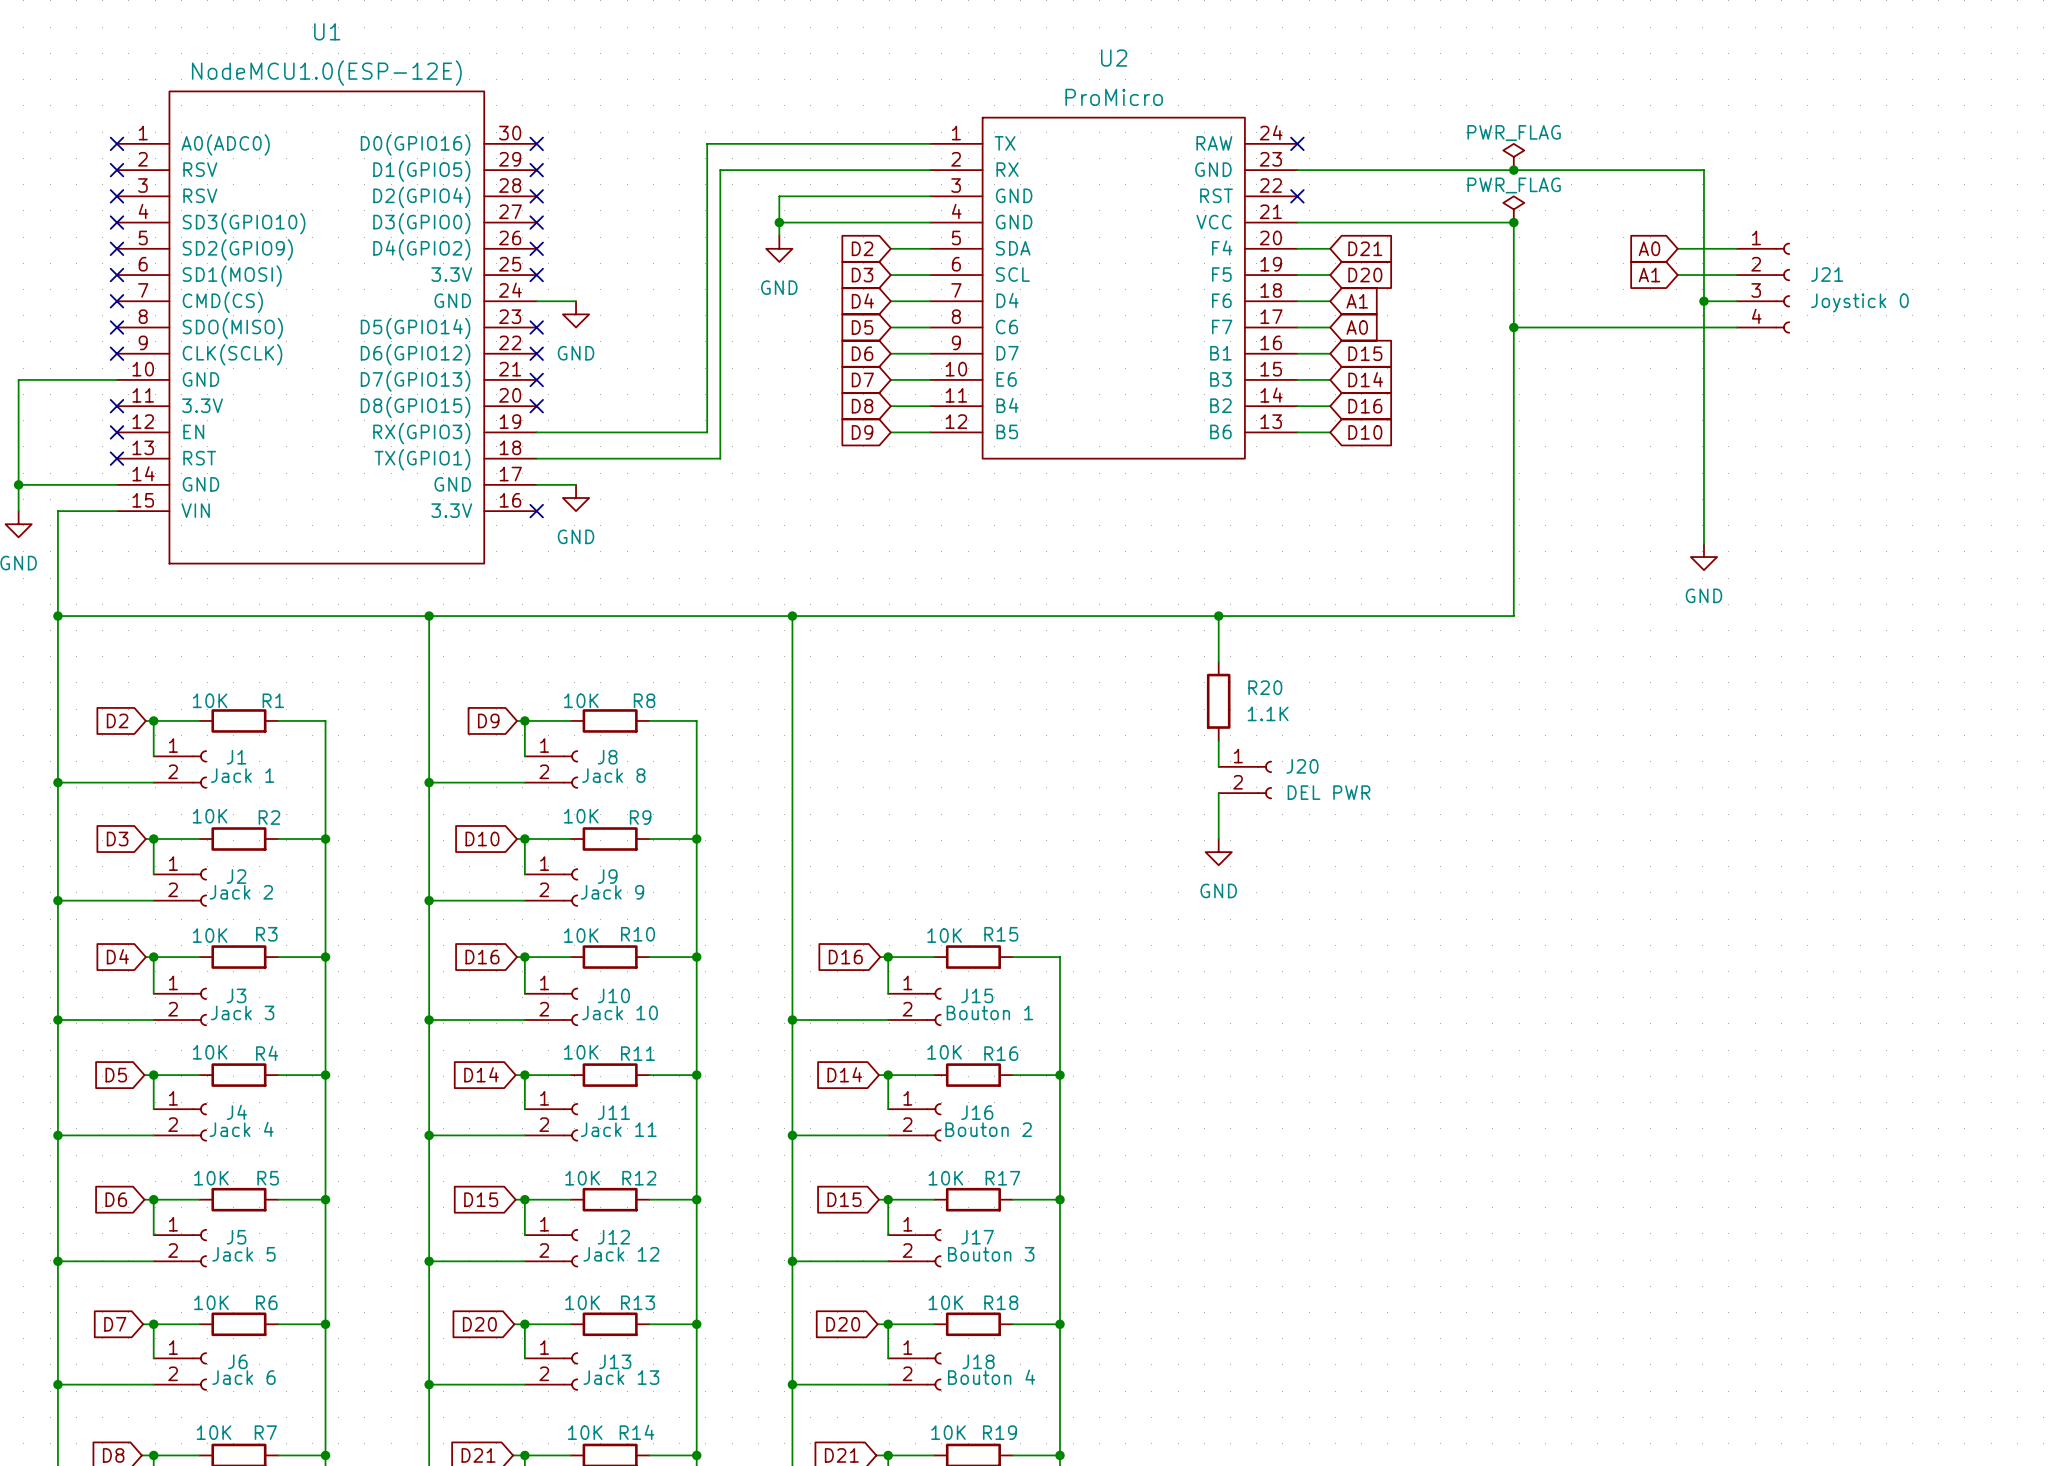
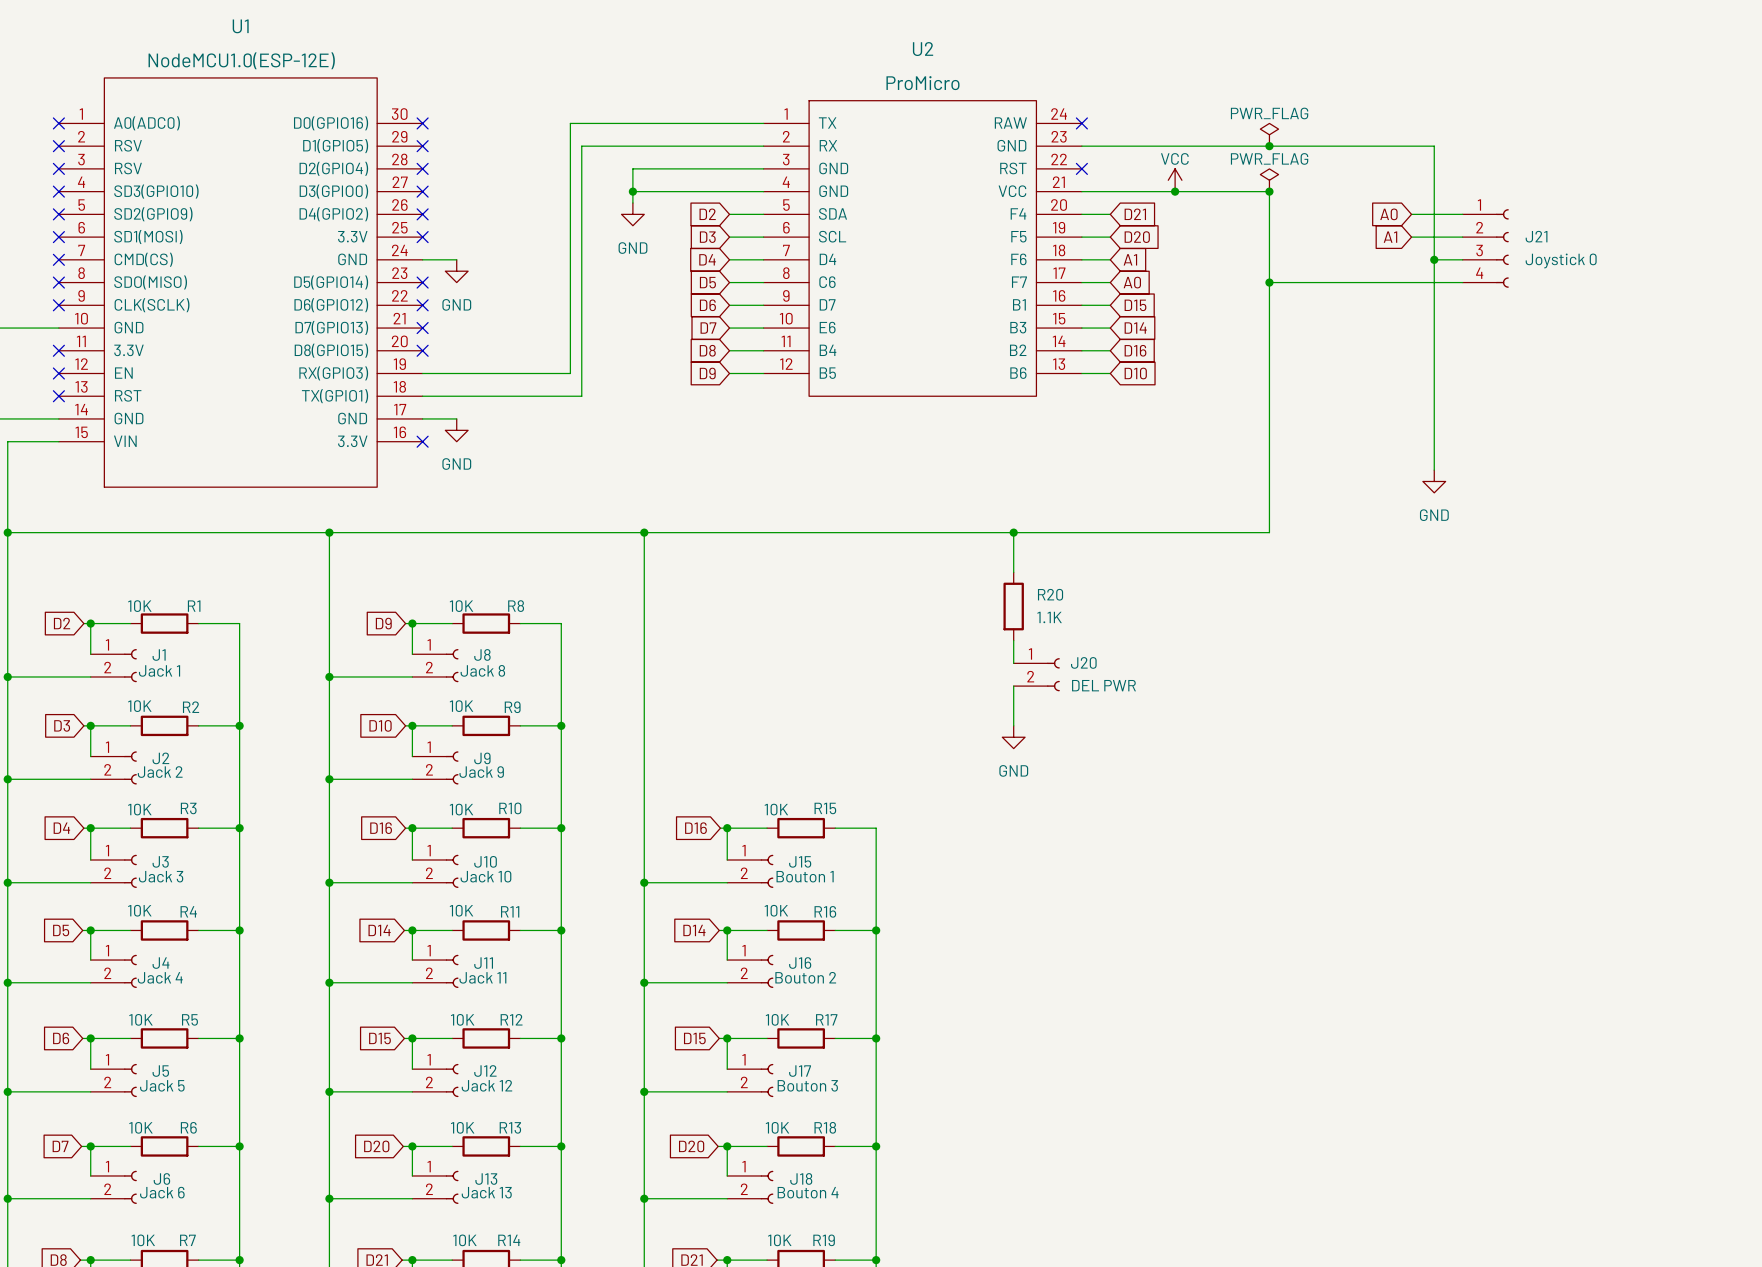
power symbol: none -> VCC (1175, 180)
junction: none -> (1175, 191)

